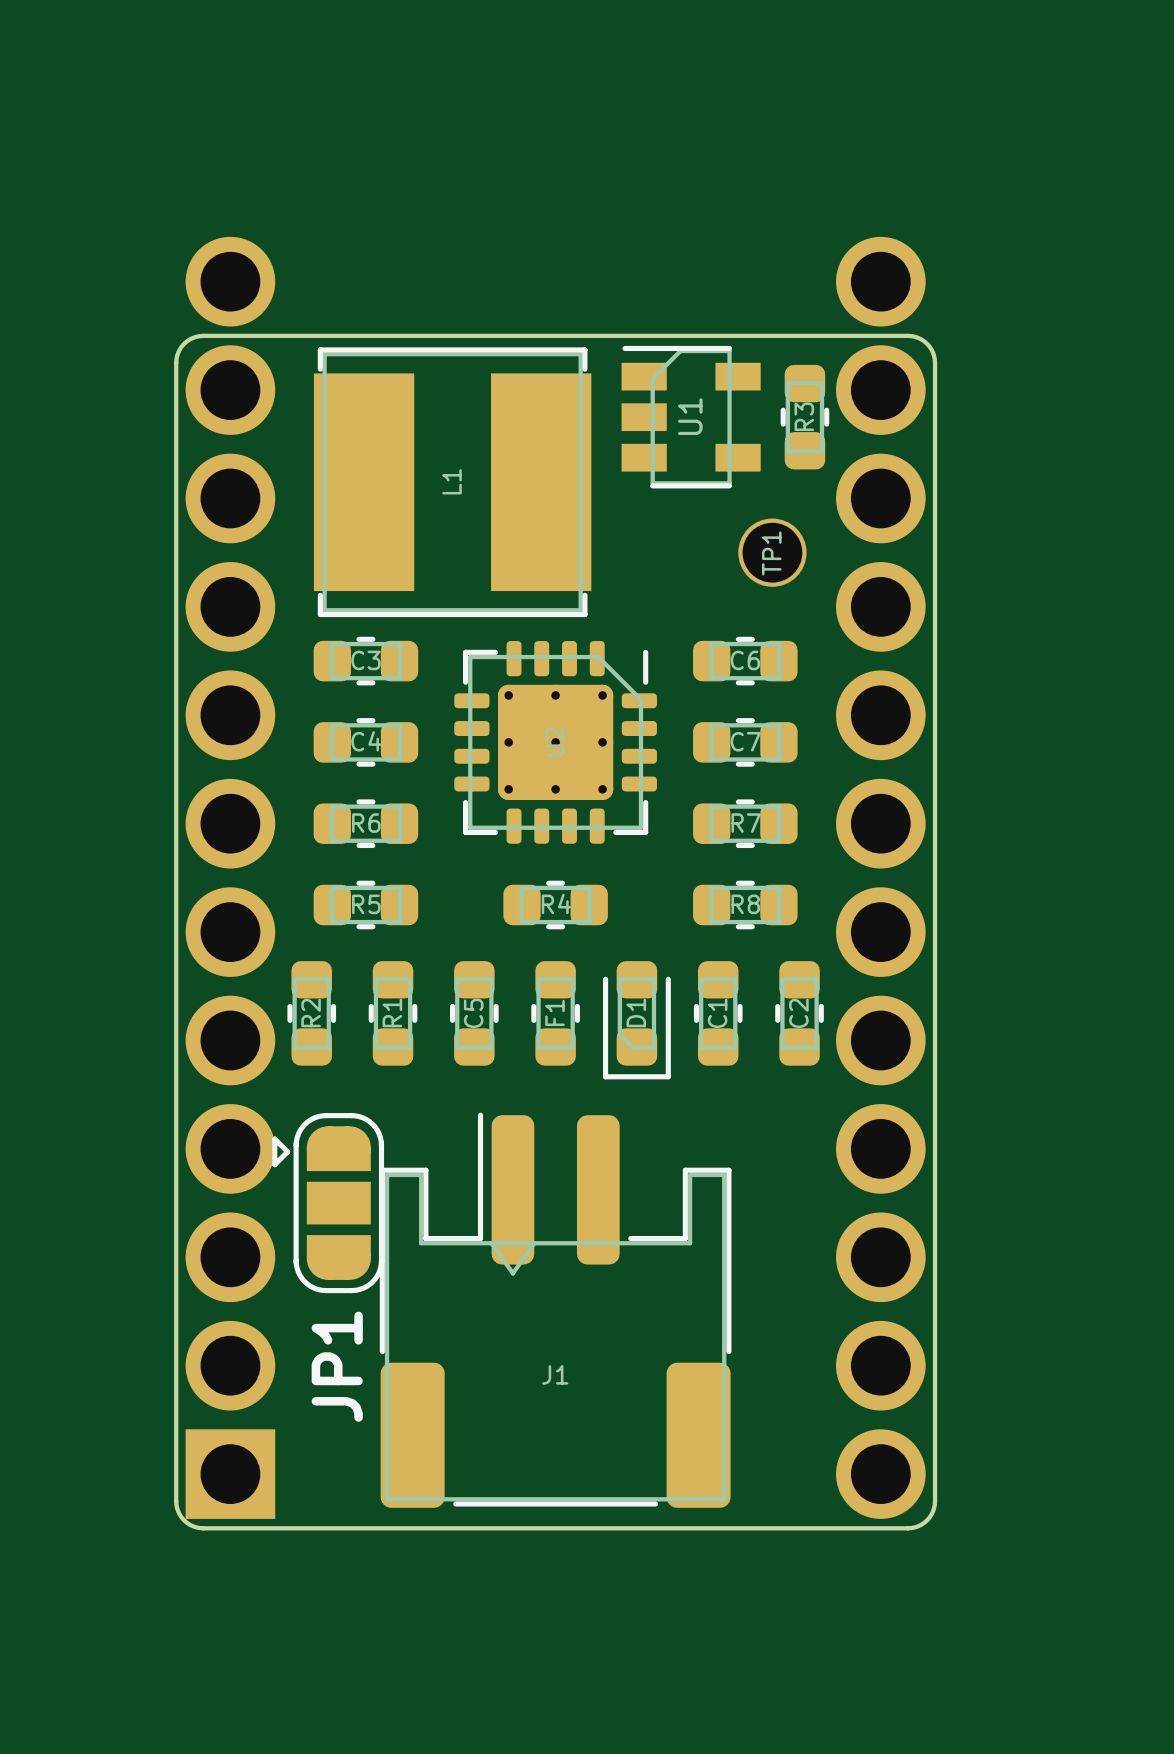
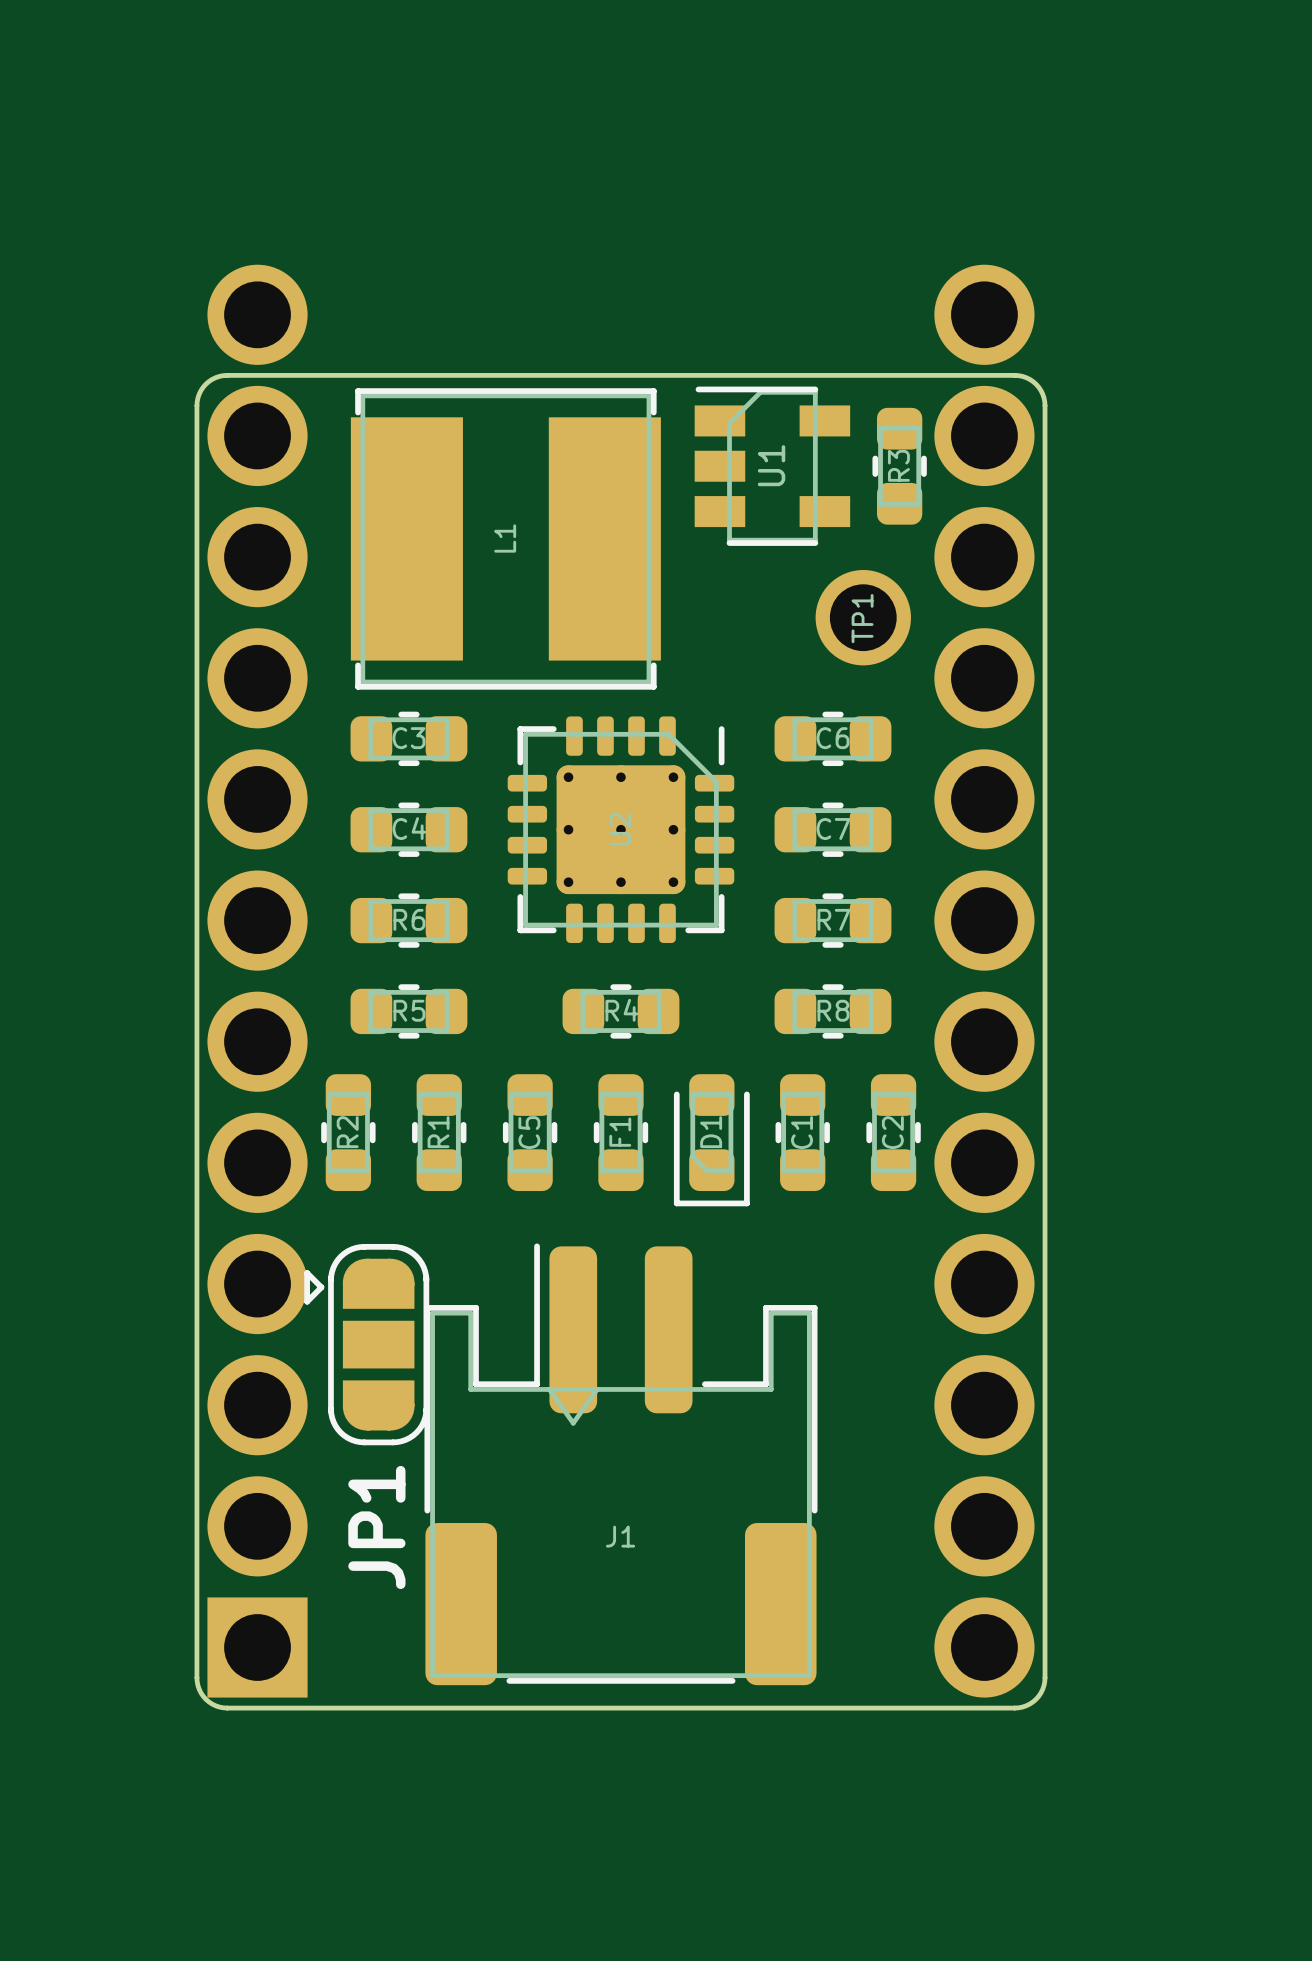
TP1 footprint: [738, 518, 807, 587] -> [815, 570, 911, 666]

